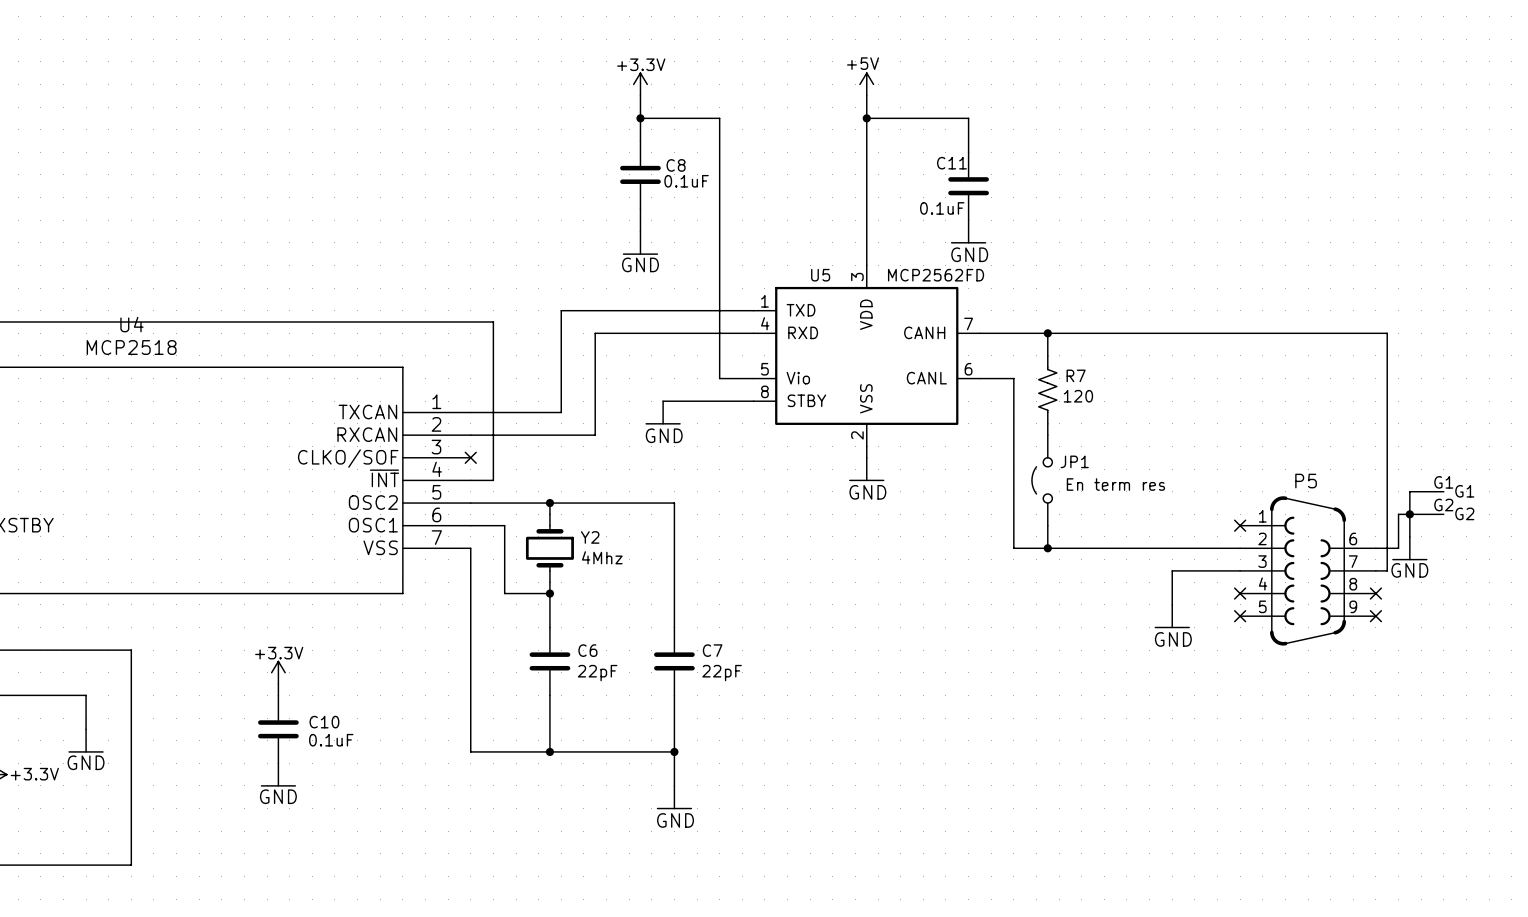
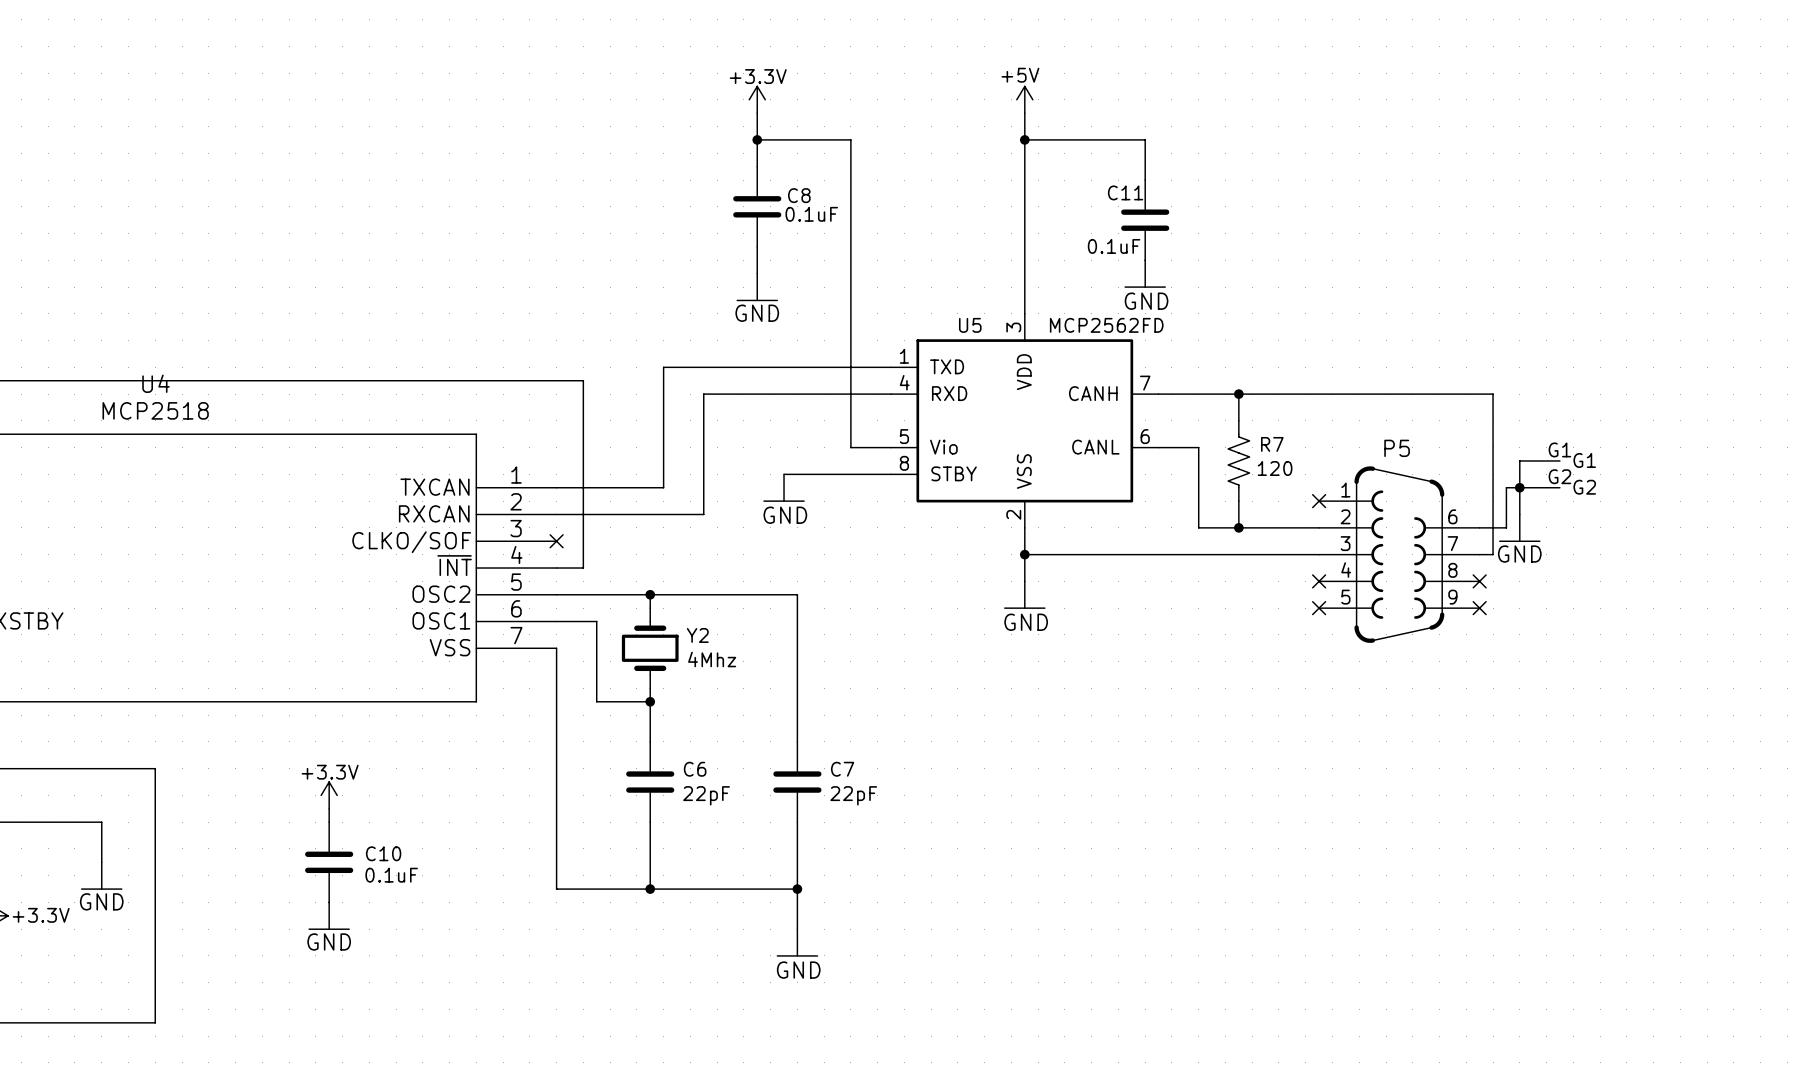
wire: (1262, 333) (1387, 333) (1387, 570) (1375, 570) -> (1493, 394) (1493, 554) (1479, 554)
junction: none -> (1519, 487)
no-connect mark: none -> (1319, 501)
wire: (1013, 446) (1013, 548) (1240, 548) -> (1198, 527) (1319, 527)
junction: none -> (1238, 527)
power symbol: none -> GND (1519, 527)
wire: none -> (1024, 554) (1319, 554)
junction: none -> (1024, 554)
power symbol position: GND (866, 469) -> GND (1024, 594)
JP1: En term res (1042, 480) -> none
no-connect mark: none -> (1319, 581)
no-connect mark: none -> (1479, 581)
wire: (1443, 491) (1409, 491) (1409, 536) -> (1559, 460) (1519, 460) (1519, 514)
no-connect mark: none -> (1319, 608)
junction: (1409, 514) -> none
wire: (1443, 514) (1398, 514) (1398, 548) (1375, 548) -> (1559, 487) (1506, 487) (1506, 527) (1479, 527)
wire: (1047, 525) (1047, 548) -> none
no-connect mark position: (1240, 525) -> (1479, 608)
junction: (1047, 548) -> none
power symbol: GND (1409, 548) -> none
wire: (1240, 570) (1172, 570) (1172, 604) -> none
P5 position: (1308, 570) -> (1399, 554)
no-connect mark: (1240, 593) -> none
no-connect mark: (1375, 593) -> none
power symbol: GND (1172, 616) -> none
no-connect mark: (1240, 616) -> none
no-connect mark: (1375, 616) -> none

